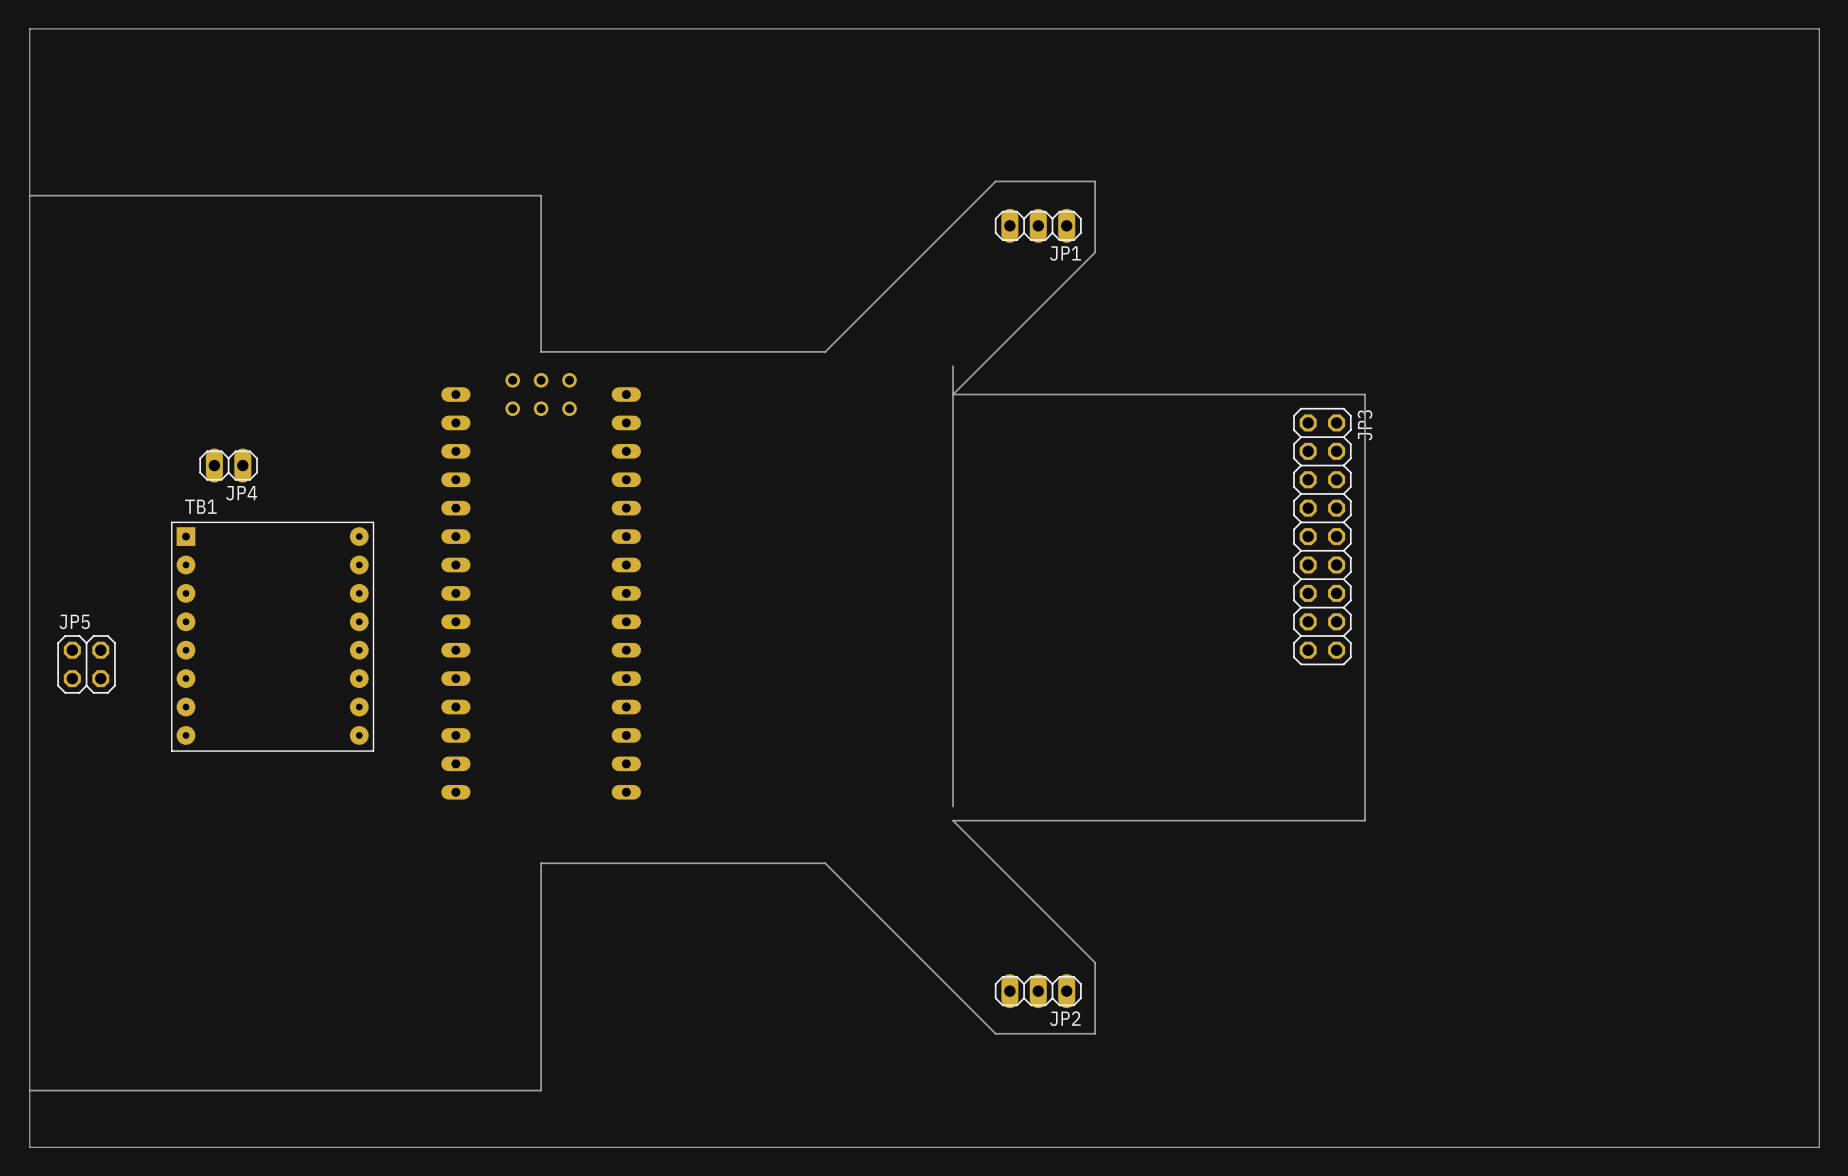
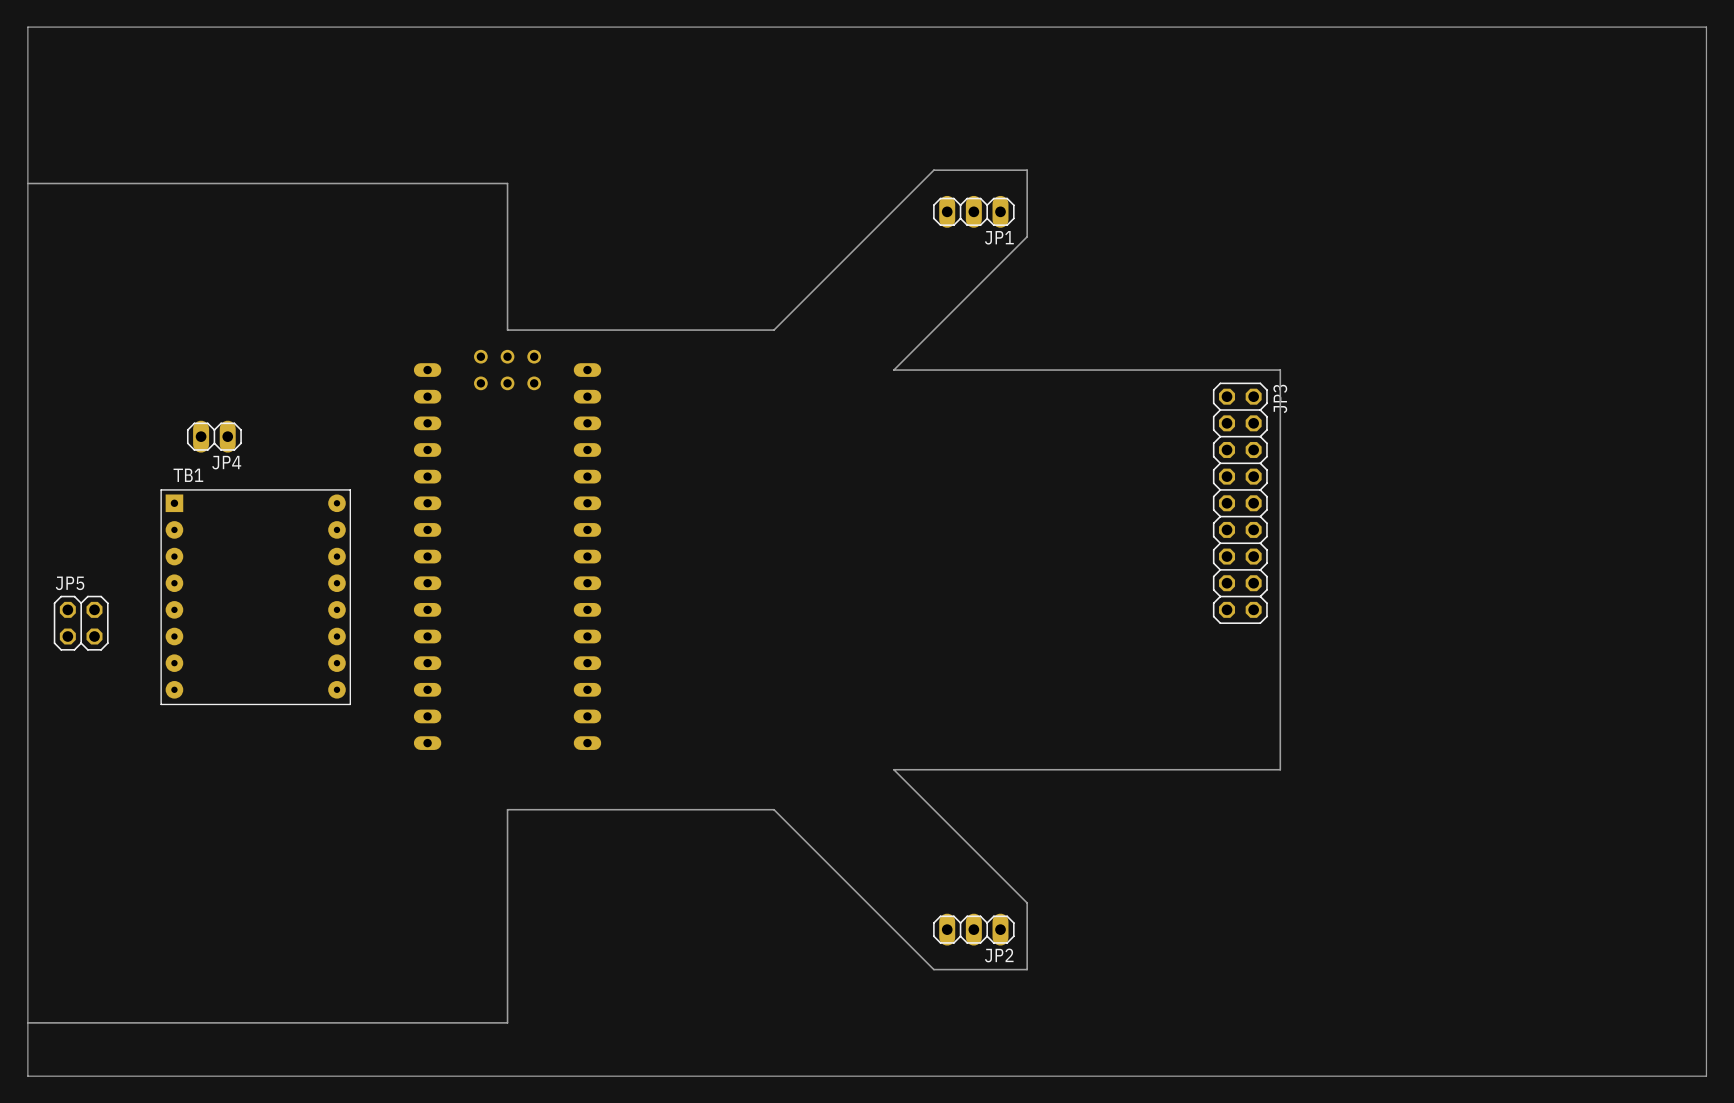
board edge: (953, 366) (953, 806) -> none

